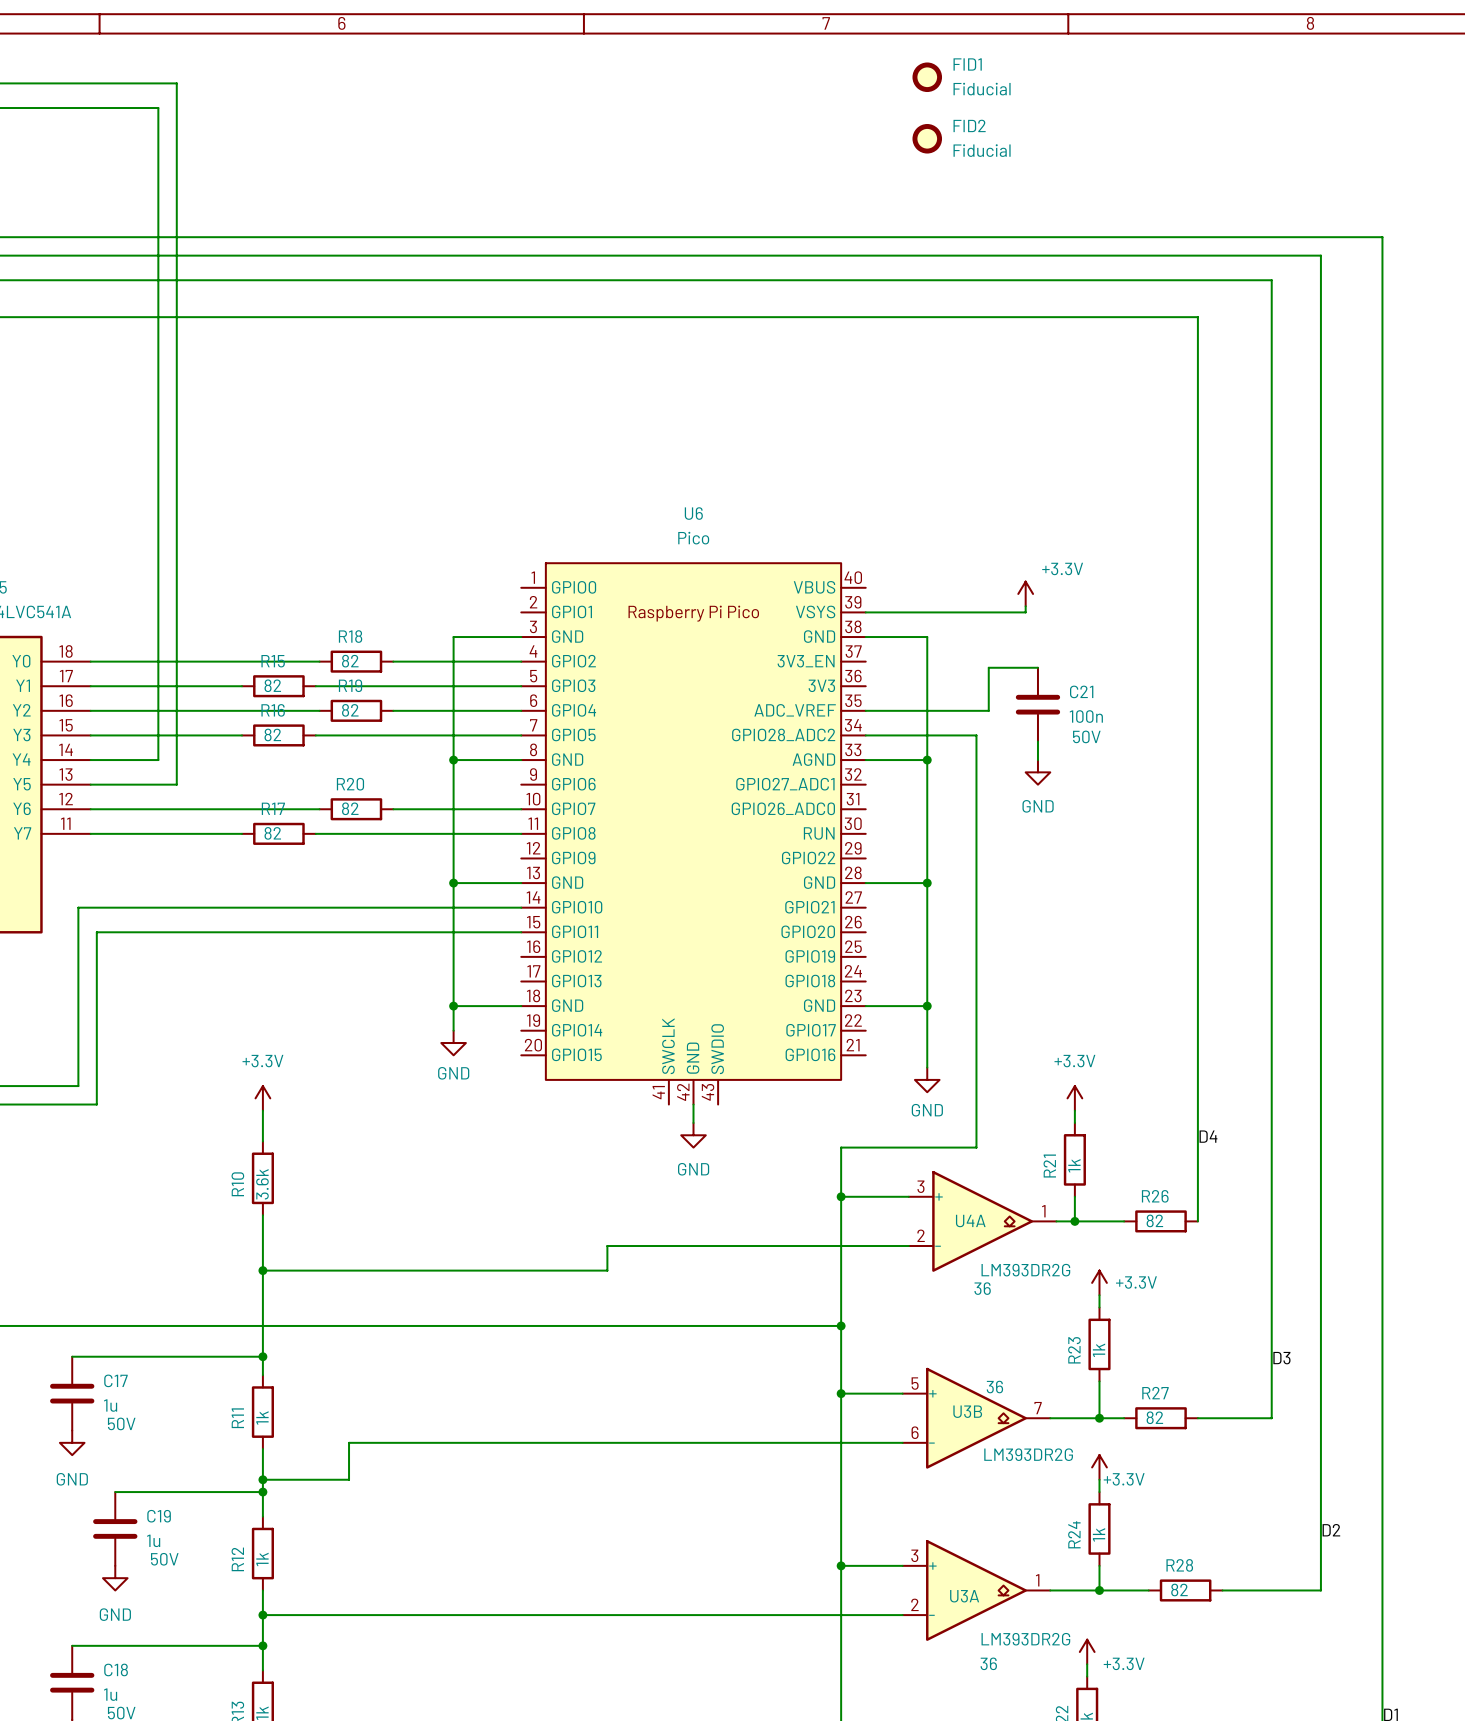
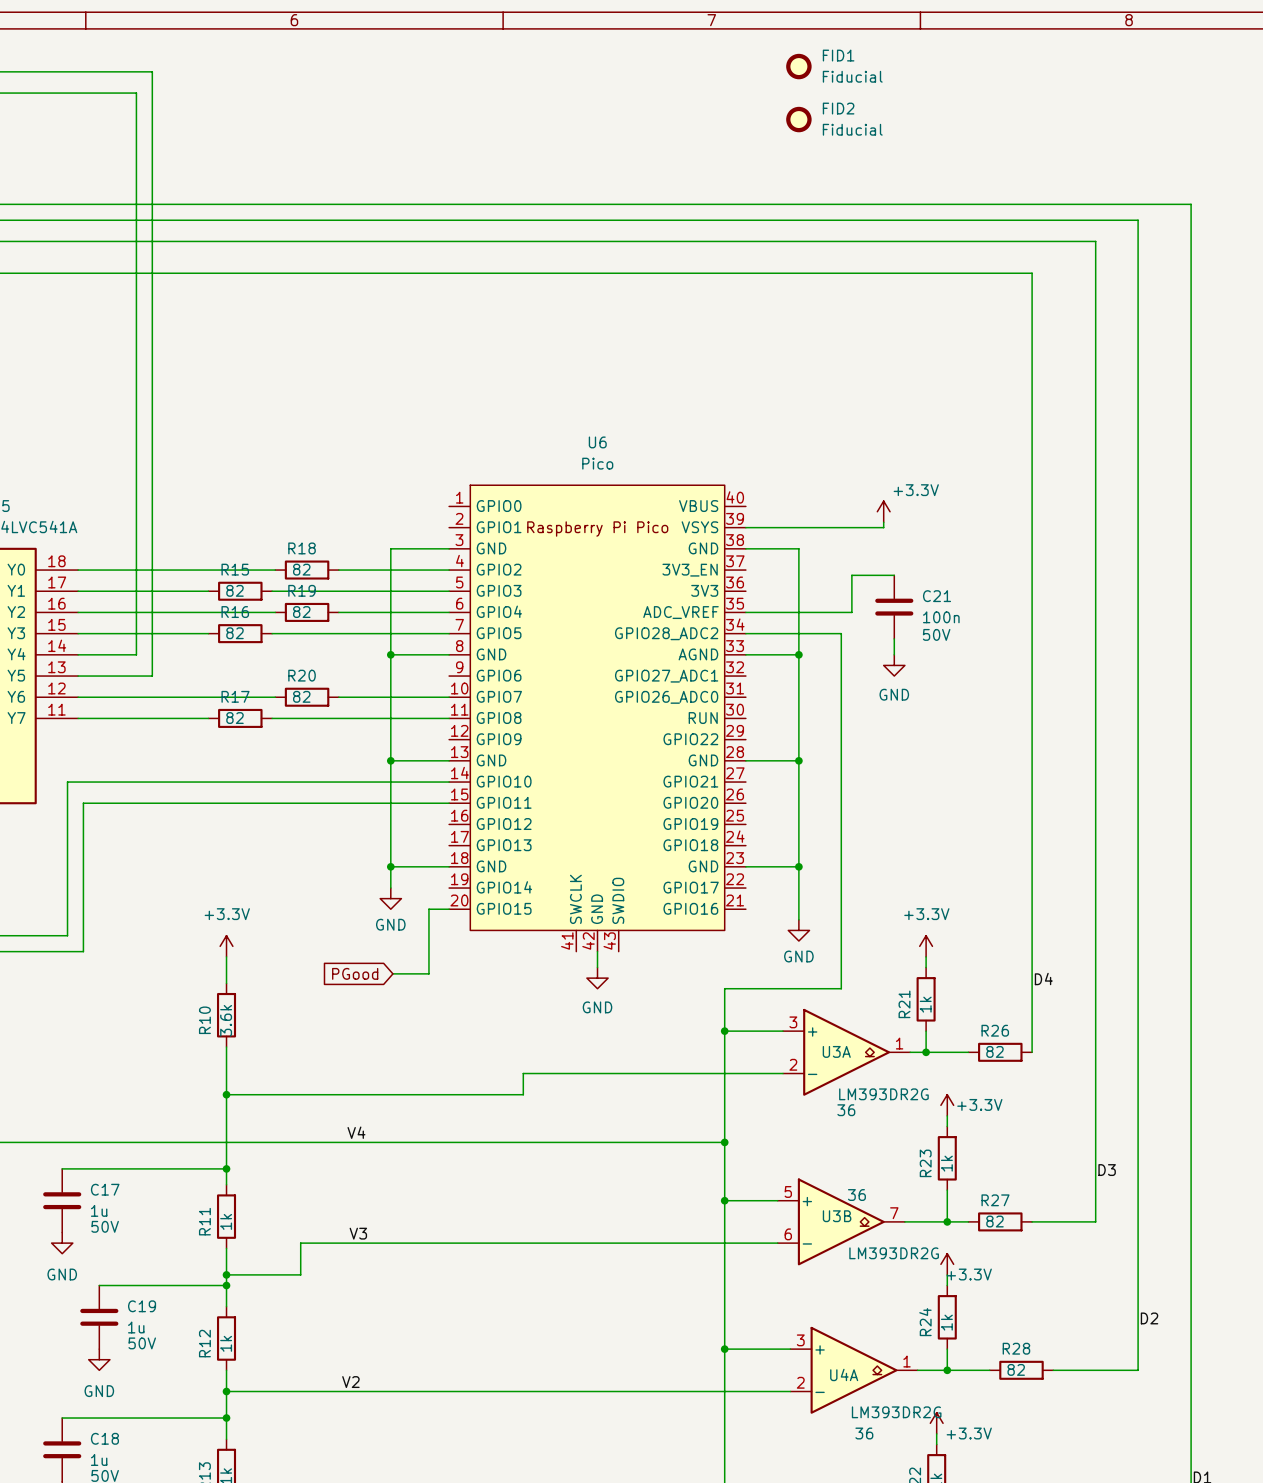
wire: none -> (449, 909) (428, 909) (428, 973) (392, 973)
global label: none -> PGood (355, 973)
U4A name: U4A (970, 1221) -> U3A (836, 1051)
label: none -> V4 (356, 1132)
label: none -> V3 (358, 1233)
U3A: LM393DR2G (976, 1590) -> none
U4A: none -> LM393DR2G (854, 1370)
label: none -> V2 (350, 1382)

